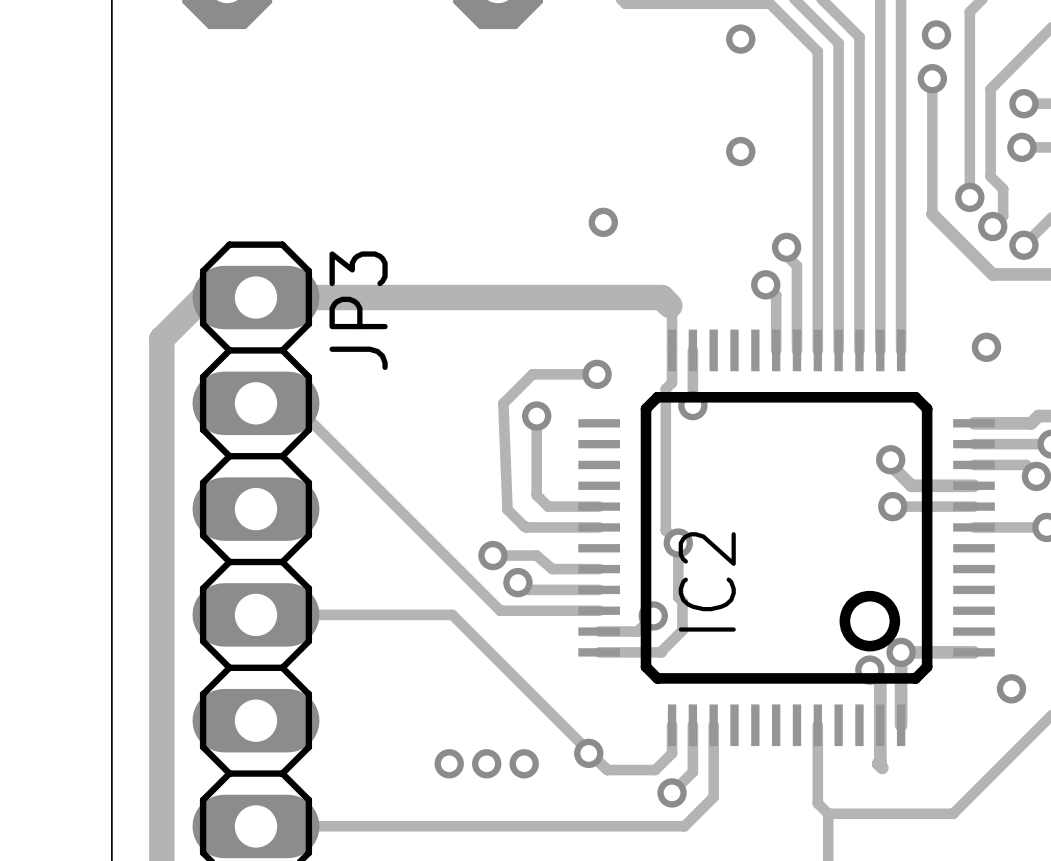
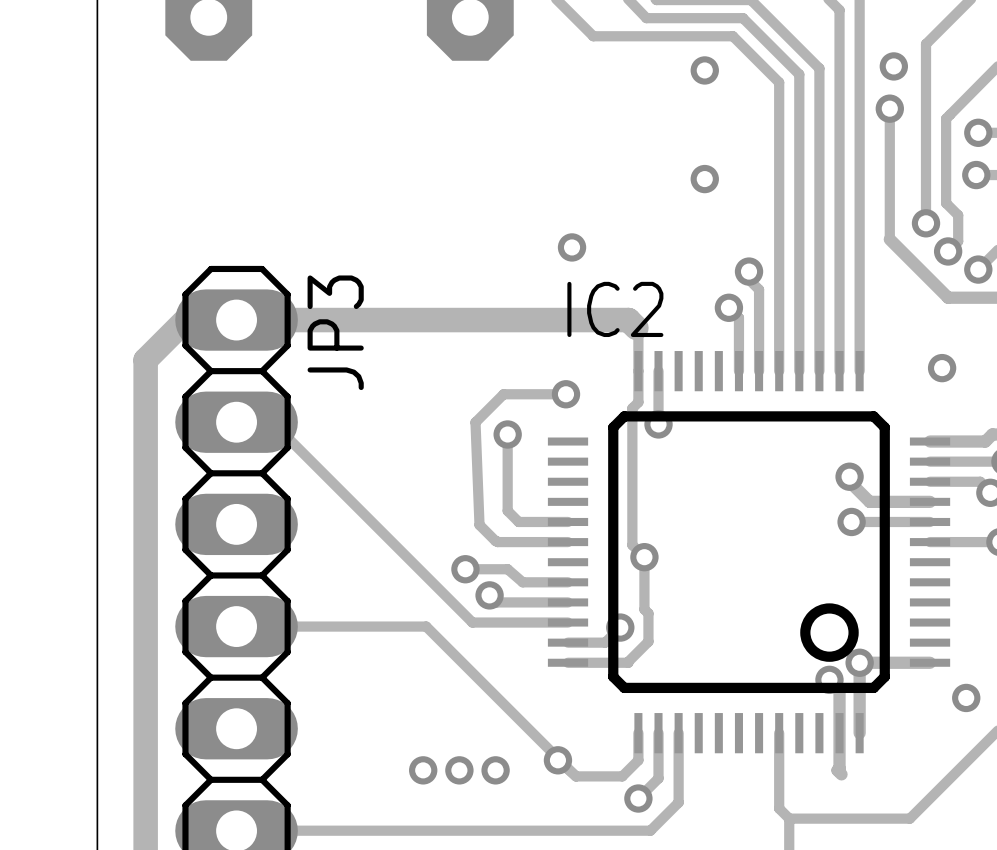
IC2 name rotation: 0° (707, 581) -> 90° clockwise (615, 309)
IC2 name position: IC2 (707, 581) -> IC2 (615, 309)

